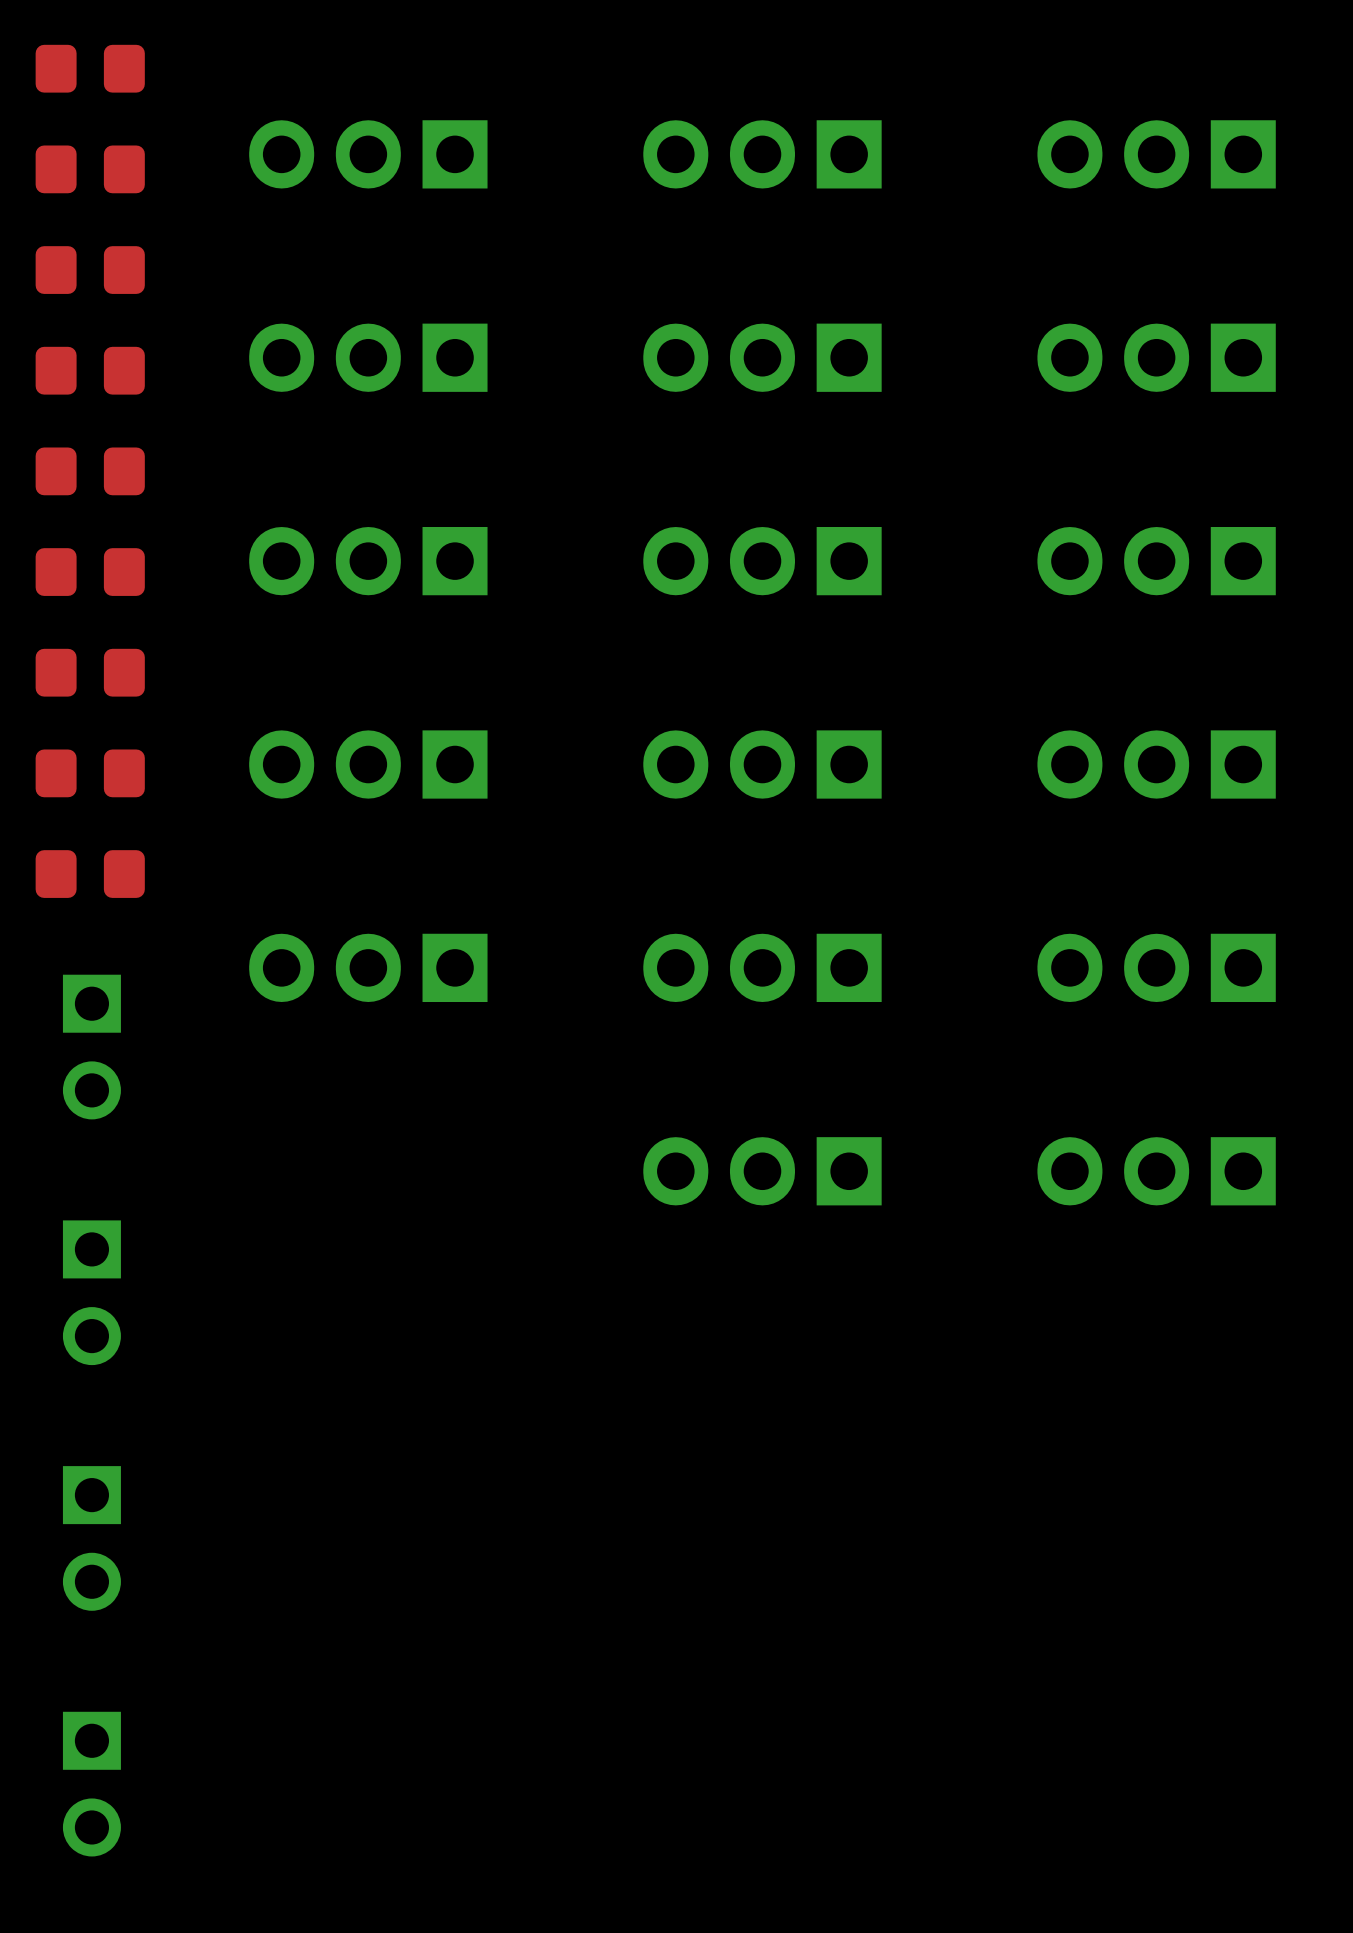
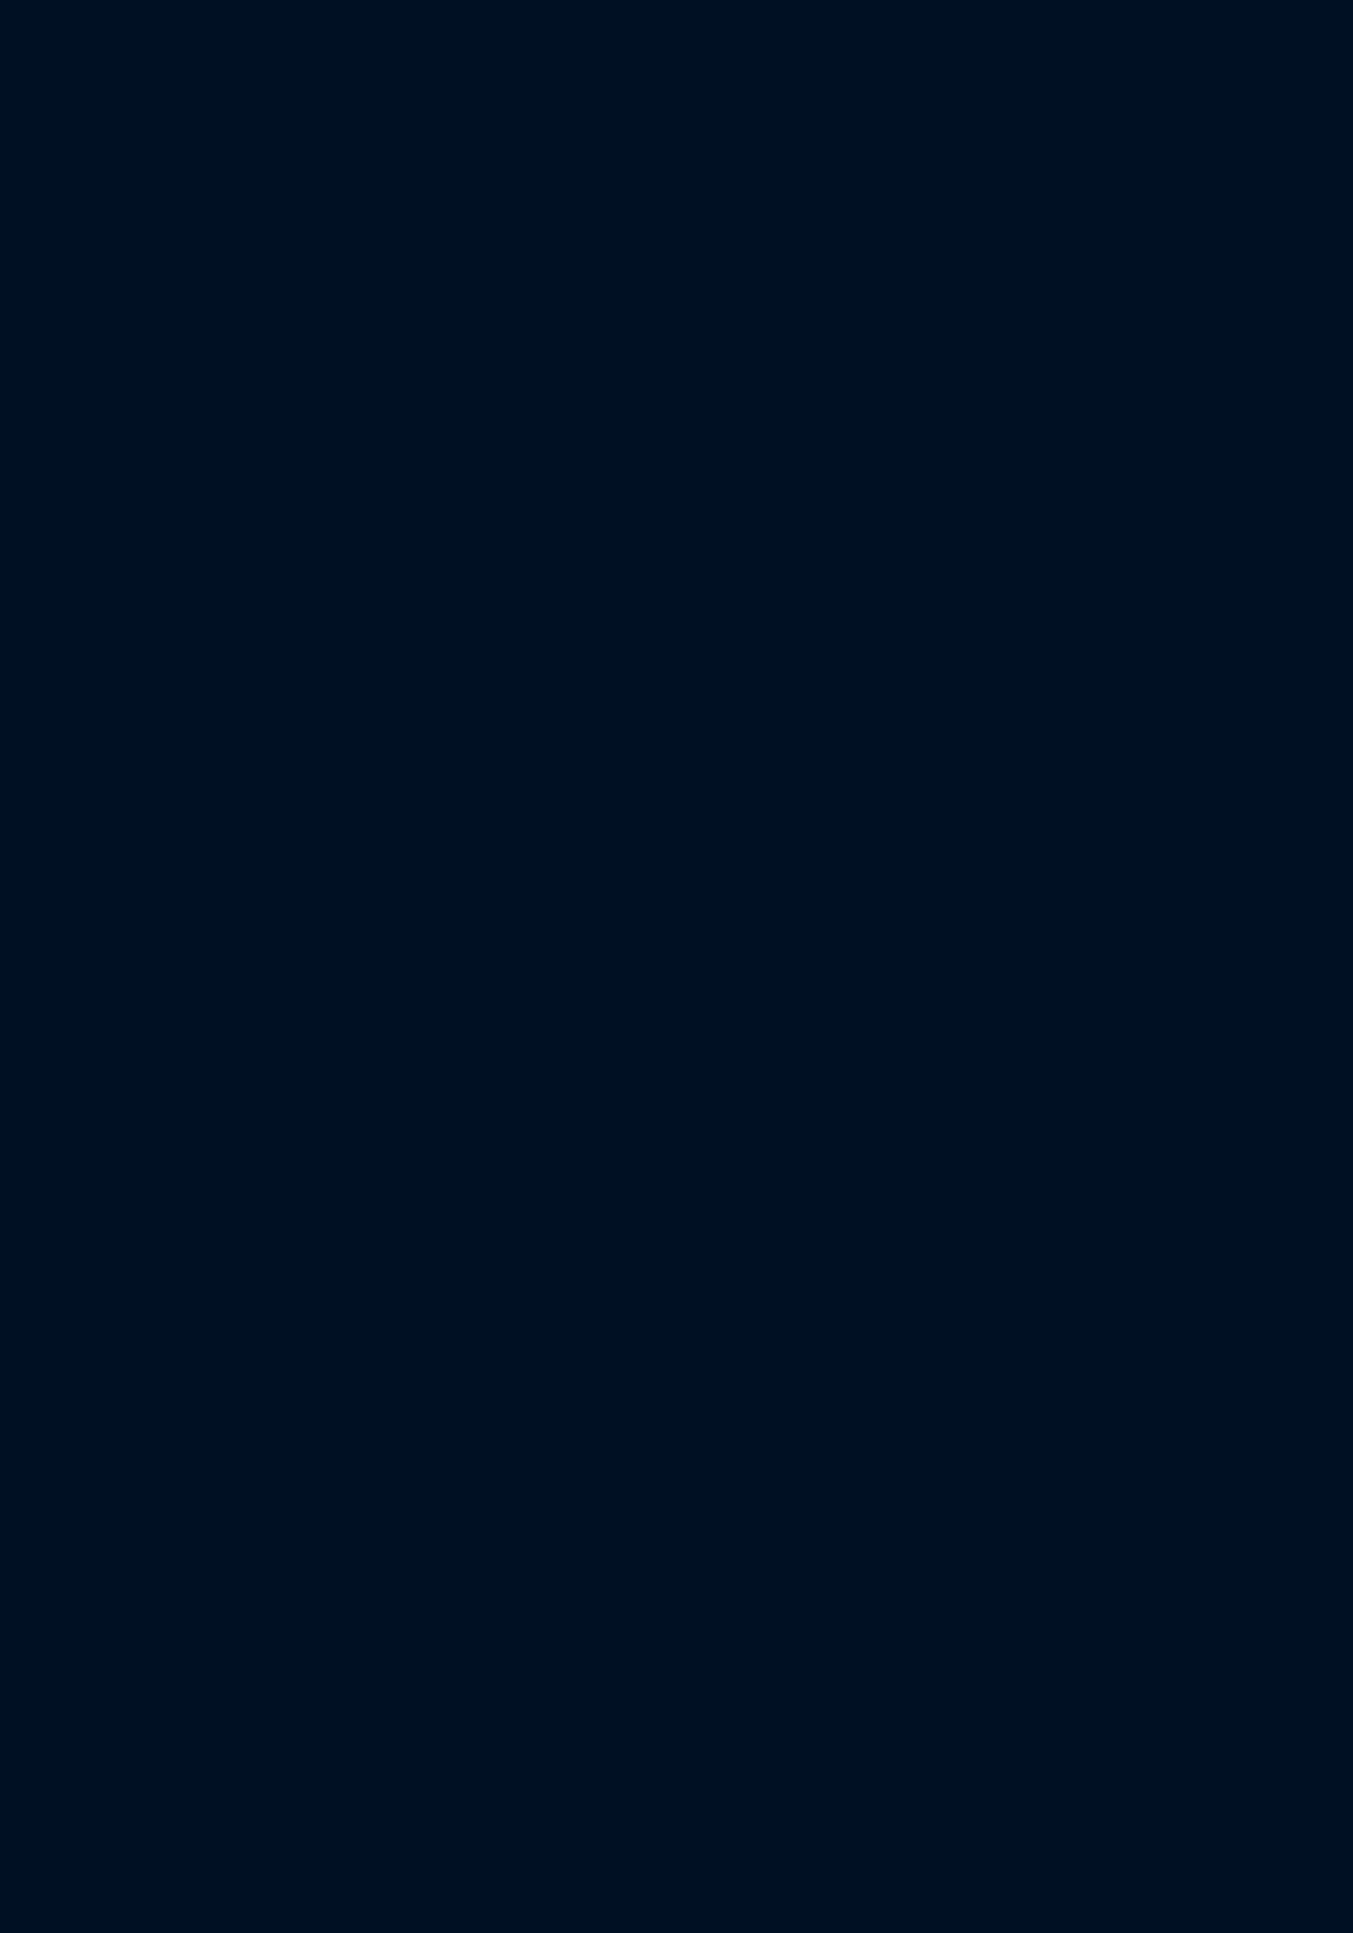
part: (90, 68) -> none
part: (368, 154) -> none
part: (762, 154) -> none
part: (1156, 154) -> none
part: (90, 169) -> none
part: (90, 270) -> none
part: (368, 357) -> none
part: (762, 357) -> none
part: (1156, 357) -> none
part: (90, 370) -> none
part: (90, 471) -> none
part: (368, 561) -> none
part: (762, 561) -> none
part: (1156, 561) -> none
part: (90, 572) -> none
part: (90, 672) -> none
part: (368, 764) -> none
part: (762, 764) -> none
part: (1156, 764) -> none
part: (90, 773) -> none
part: (90, 874) -> none
part: (368, 967) -> none
part: (762, 967) -> none
part: (1156, 967) -> none
part: (91, 1047) -> none
part: (762, 1171) -> none
part: (1156, 1171) -> none
part: (91, 1292) -> none
part: (91, 1538) -> none
part: (91, 1784) -> none

